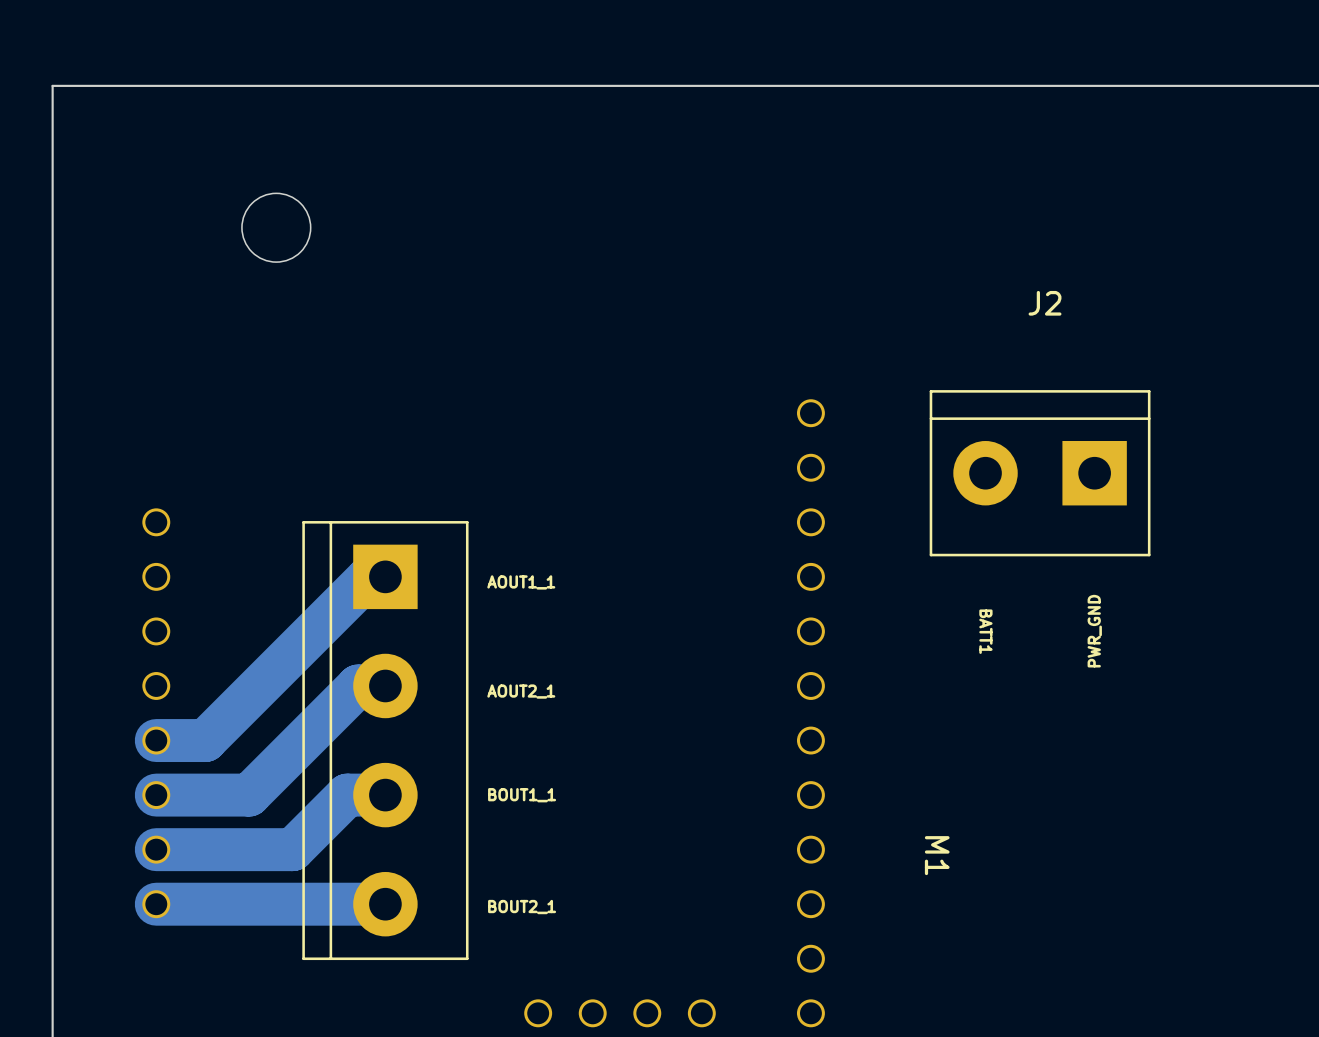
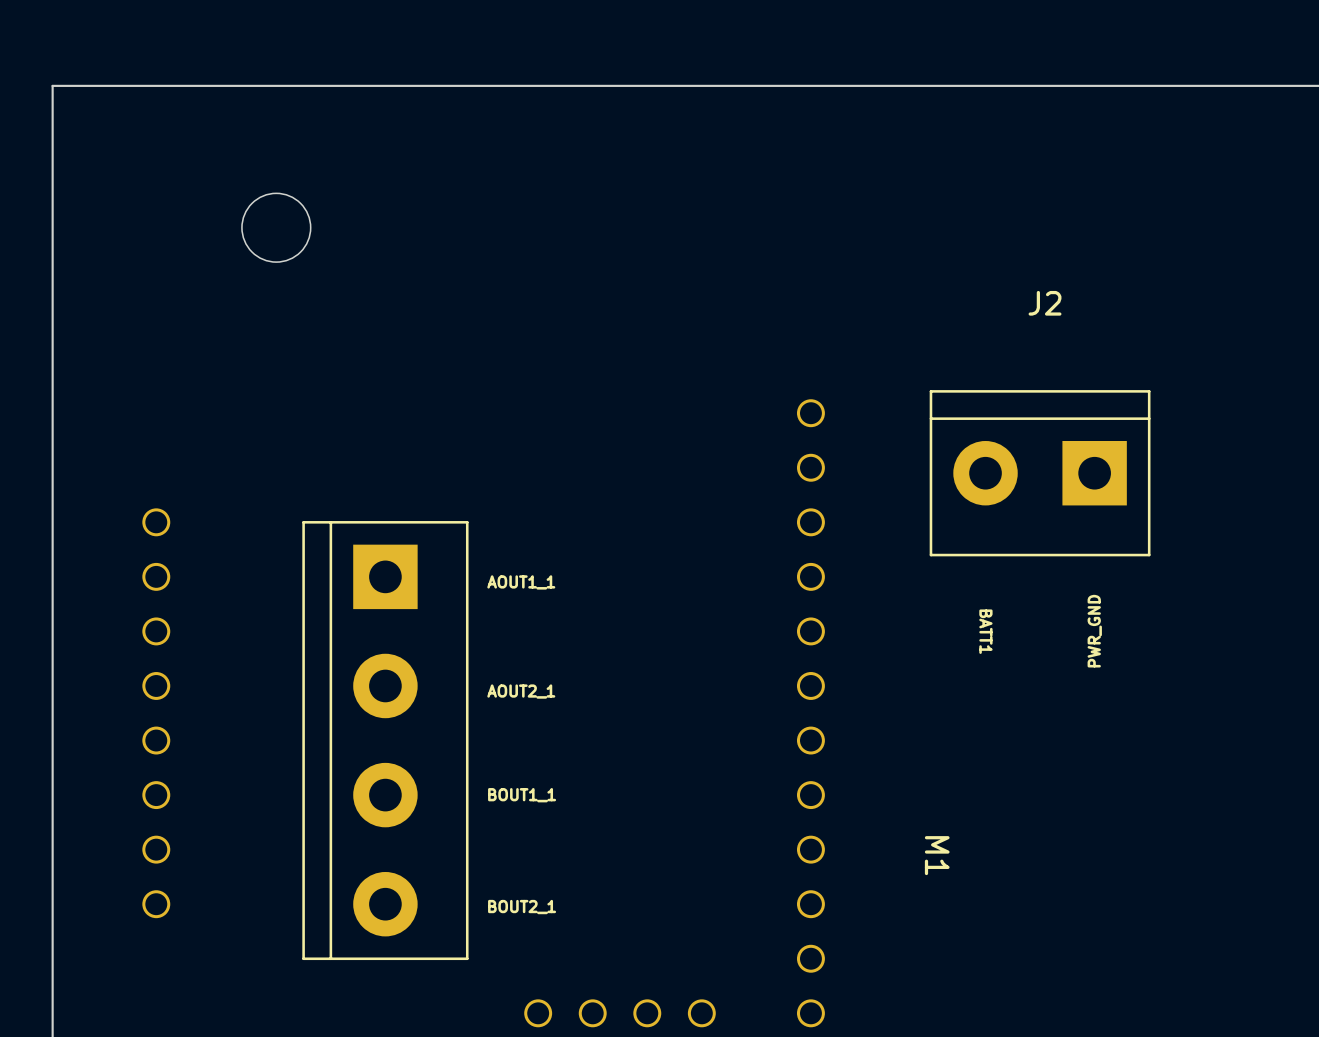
track: (385, 576) (369, 576) (205, 740) (156, 740) -> none
track: (385, 685) (358, 685) (249, 795) (156, 795) -> none
track: (385, 795) (347, 795) (292, 849) (156, 849) -> none
track: (385, 904) (156, 904) -> none

